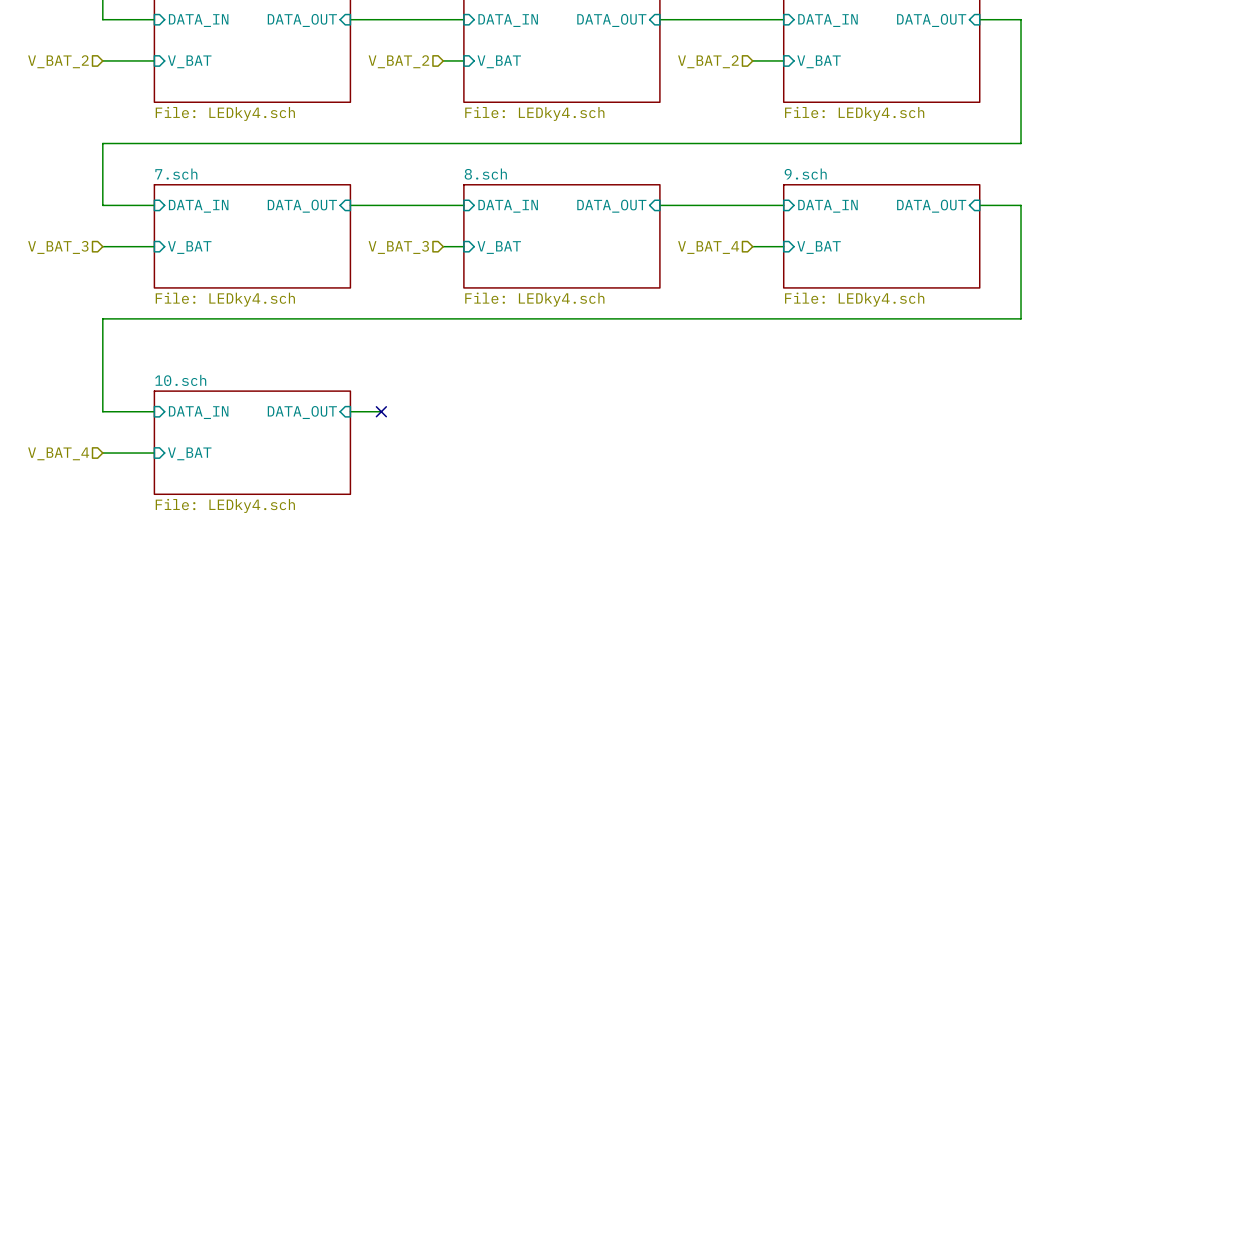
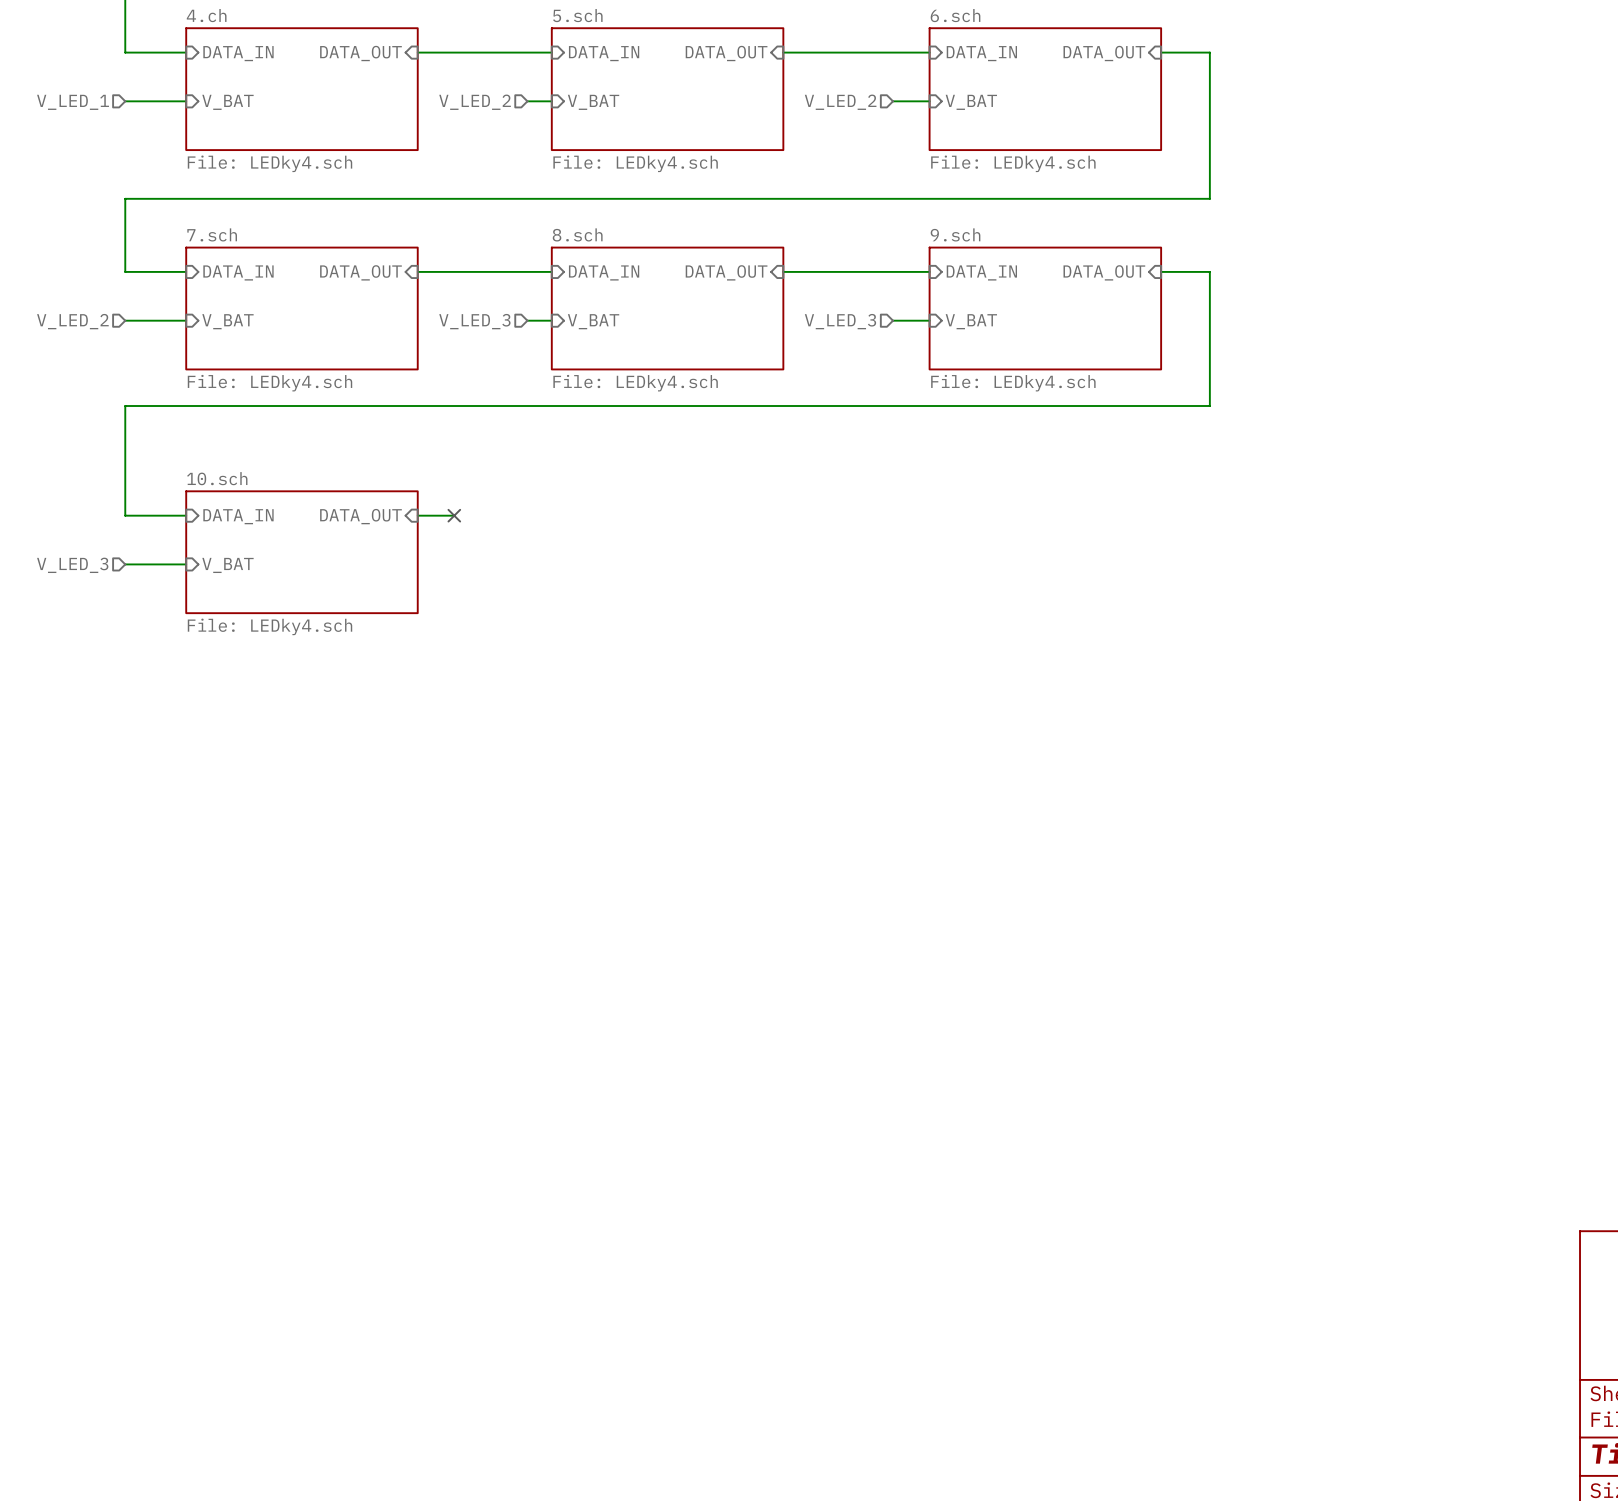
hierarchical label: V_BAT_2 (58, 61) -> V_LED_1 (73, 102)
hierarchical label: V_BAT_2 (398, 61) -> V_LED_2 (475, 102)
hierarchical label: V_BAT_2 (708, 61) -> V_LED_2 (840, 102)
hierarchical label: V_BAT_3 (58, 247) -> V_LED_2 (72, 321)
hierarchical label: V_BAT_3 (398, 247) -> V_LED_3 (474, 321)
hierarchical label: V_BAT_4 (708, 247) -> V_LED_3 (840, 321)
hierarchical label: V_BAT_4 (58, 453) -> V_LED_3 (72, 565)

